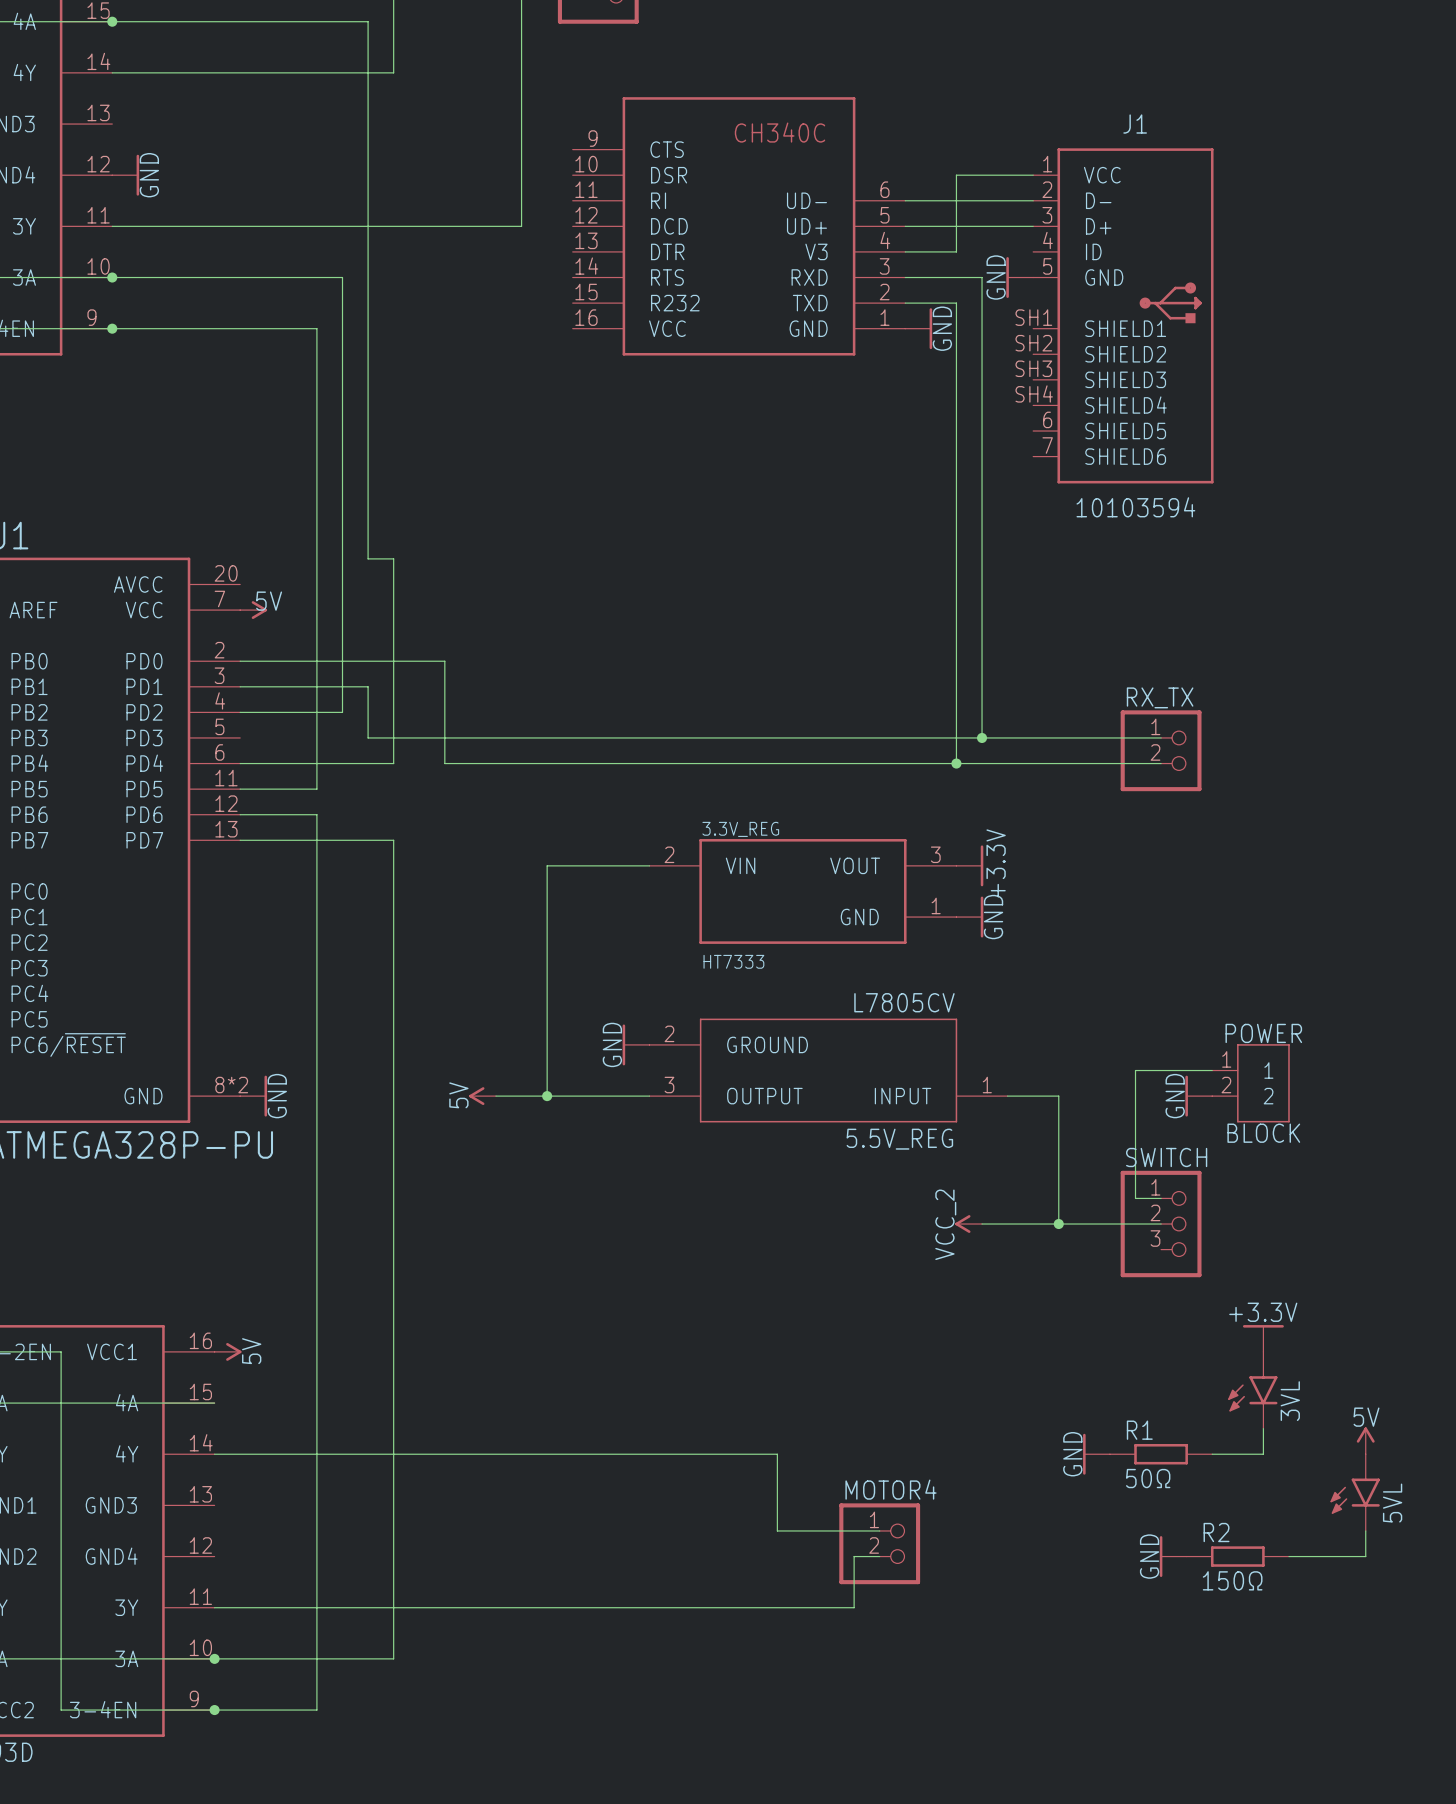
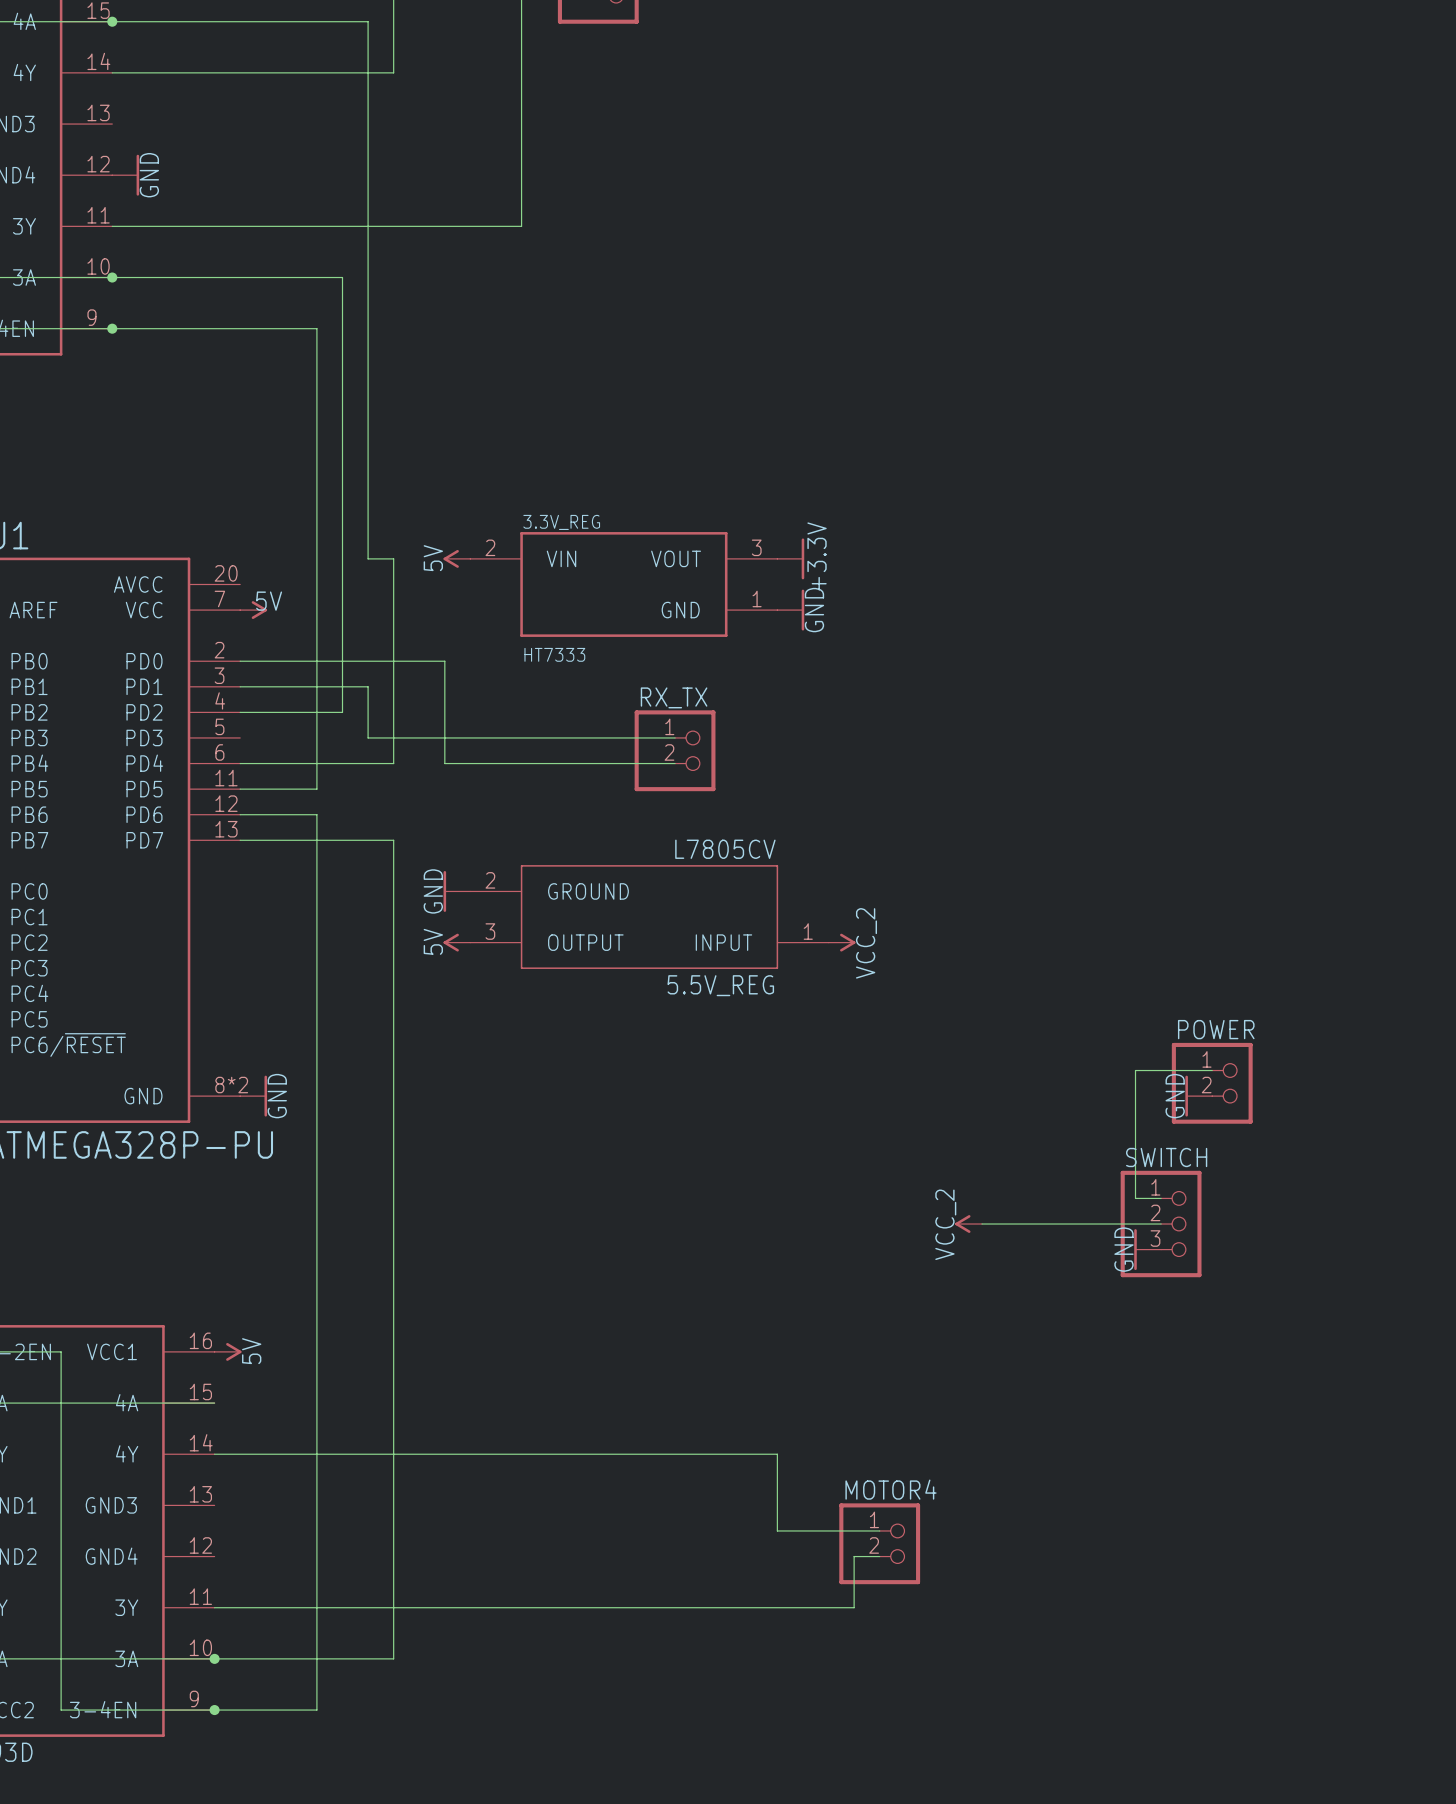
wire: (1033, 175) (956, 175) (956, 251) (905, 251) -> none
wire: (905, 200) (1033, 200) -> none
part: (739, 226) -> none
wire: (905, 226) (1033, 226) -> none
wire: (905, 277) (982, 277) (982, 737) -> none
power symbol: GND (1019, 277) -> none
wire: (905, 303) (956, 303) (956, 763) -> none
J1: 10103594 (1123, 315) -> none
power symbol: GND (918, 328) -> none
power symbol: none -> 5V (456, 558)
power symbol: none -> +3.3V (790, 558)
power symbol: none -> GND (790, 610)
wire: (675, 737) (1161, 737) -> none
junction: (982, 737) -> none
RX_TX: none -> (675, 750)
RX_TX: (1161, 750) -> none
wire: (675, 763) (1161, 763) -> none
junction: (956, 763) -> none
wire: (649, 865) (547, 865) (547, 1096) -> none
power symbol: +3.3V (969, 865) -> none
power symbol: none -> GND (456, 891)
3.3V_REG position: (802, 891) -> (623, 584)
power symbol: GND (969, 917) -> none
power symbol: none -> VCC_2 (841, 942)
power symbol: GND (636, 1044) -> none
5.5V_REG position: (828, 1070) -> (649, 917)
POWER: none -> (1212, 1083)
POWER: BLOCK (1251, 1083) -> none
power symbol position: 5V (482, 1096) -> 5V (456, 942)
wire: (495, 1096) (649, 1096) -> none
junction: (547, 1096) -> none
wire: (1007, 1096) (1058, 1096) (1058, 1224) -> none
junction: (1058, 1224) -> none
power symbol: none -> GND (1147, 1249)
power symbol: +3.3V (1263, 1338) -> none
3VL: (1252, 1390) -> none
wire: (1263, 1428) (1263, 1454) (1212, 1454) -> none
power symbol: 5V (1365, 1440) -> none
power symbol: GND (1096, 1454) -> none
R1: 50Ω (1161, 1454) -> none
5VL: (1355, 1492) -> none
wire: (1365, 1530) (1365, 1556) (1288, 1556) -> none
power symbol: GND (1173, 1556) -> none
R2: 150Ω (1237, 1556) -> none

